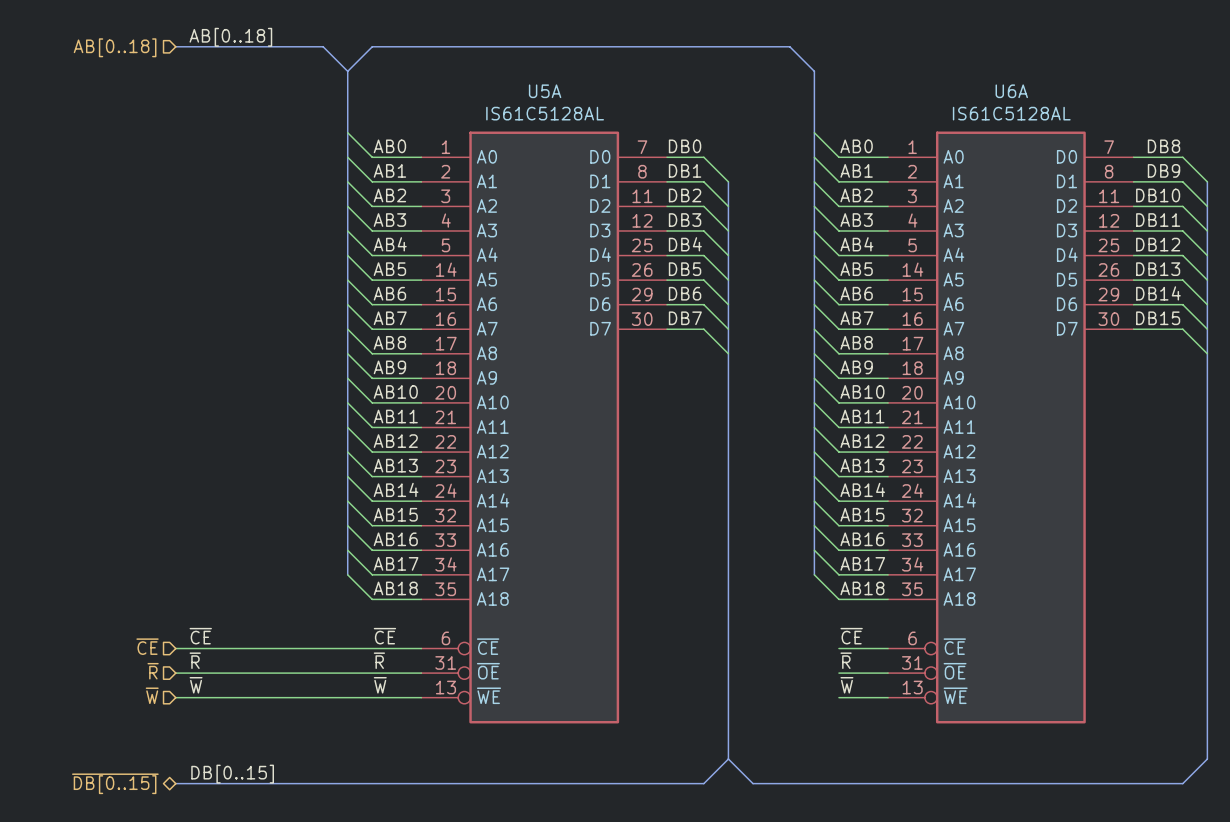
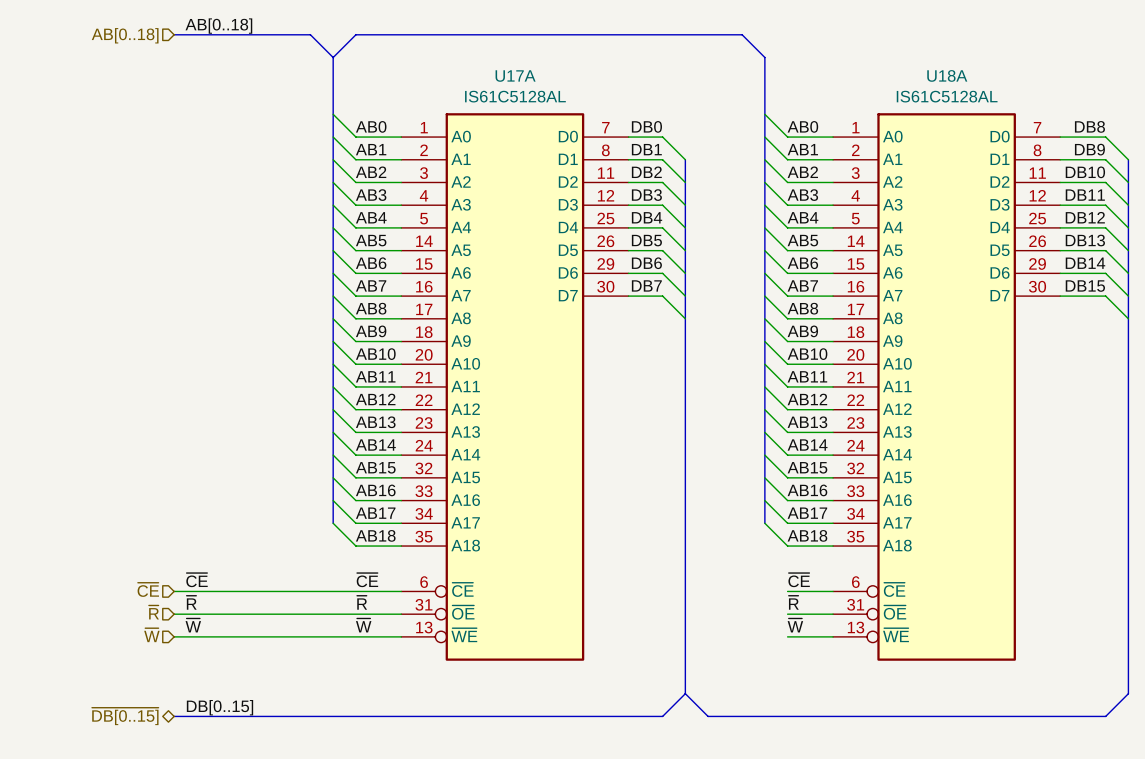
U5A name: U5A (545, 91) -> U17A (515, 76)
U6A name: U6A (1011, 91) -> U18A (947, 75)

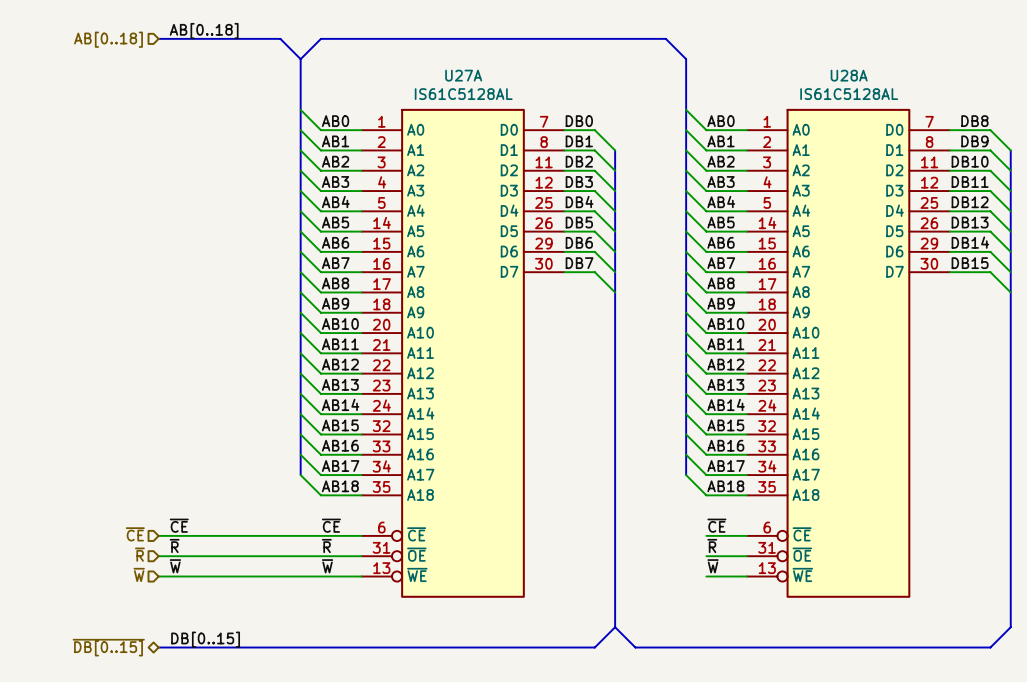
U18A name: U18A (947, 75) -> U28A (849, 75)
U17A name: U17A (515, 76) -> U27A (463, 75)

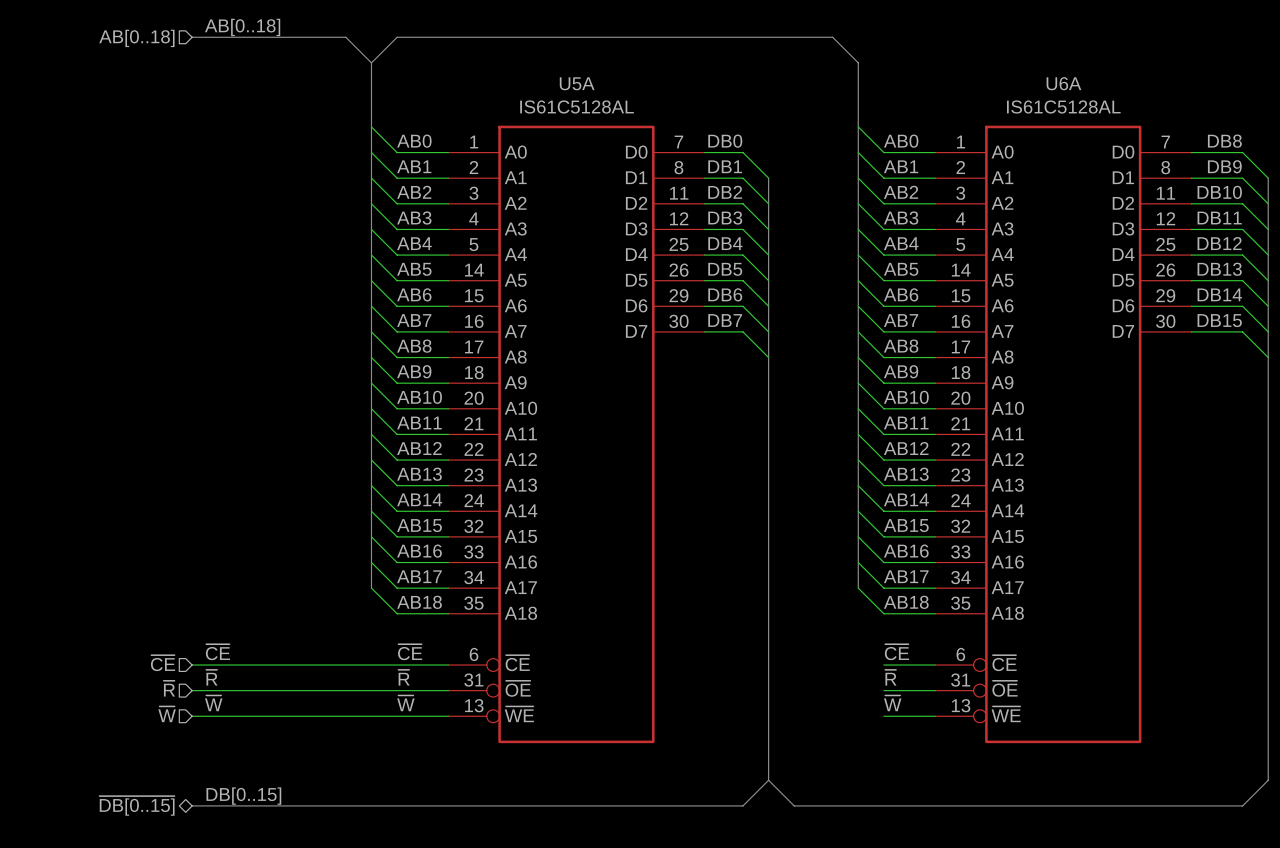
U27A name: U27A (463, 75) -> U5A (577, 83)
U28A name: U28A (849, 75) -> U6A (1063, 83)

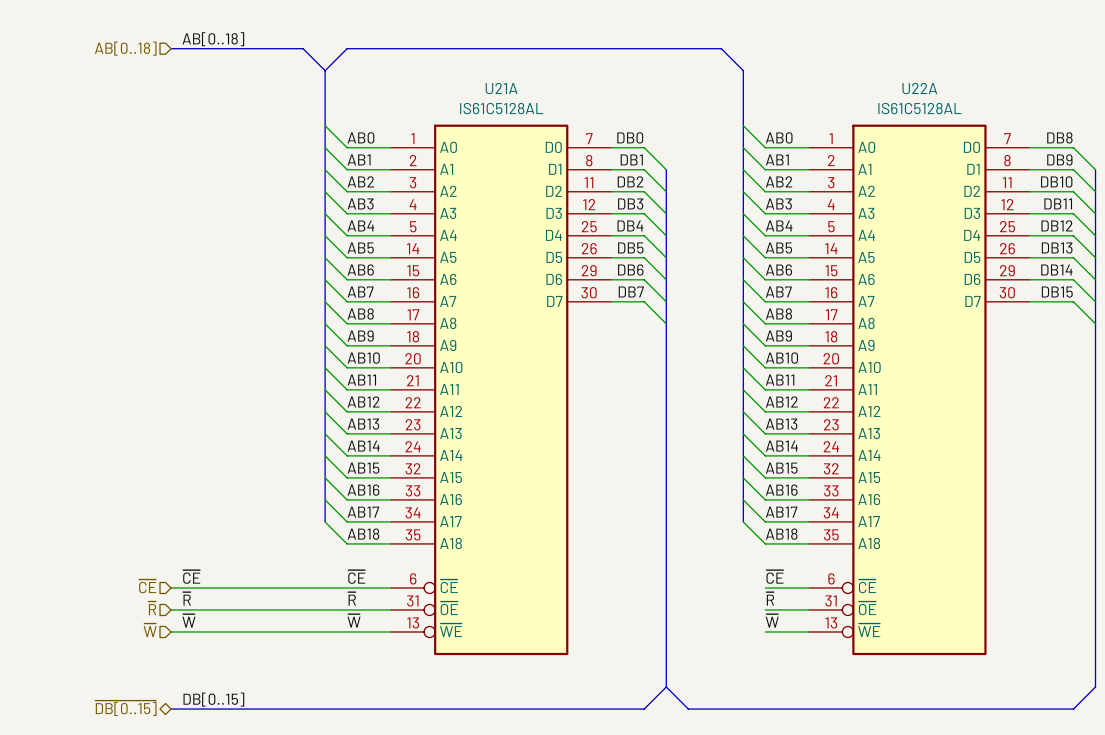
U5A name: U5A (577, 83) -> U21A (501, 88)
U6A name: U6A (1063, 83) -> U22A (919, 88)

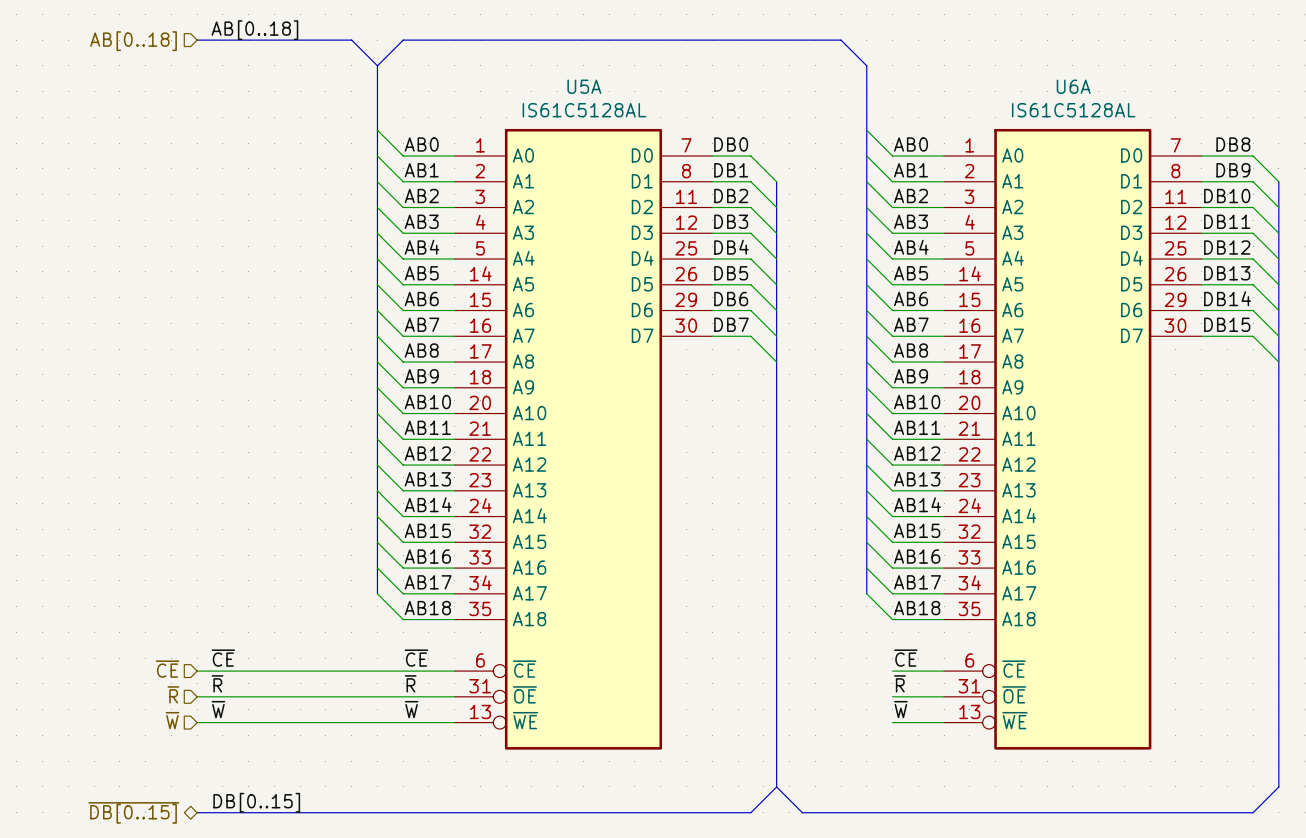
U21A name: U21A (501, 88) -> U5A (584, 86)
U22A name: U22A (919, 88) -> U6A (1073, 86)

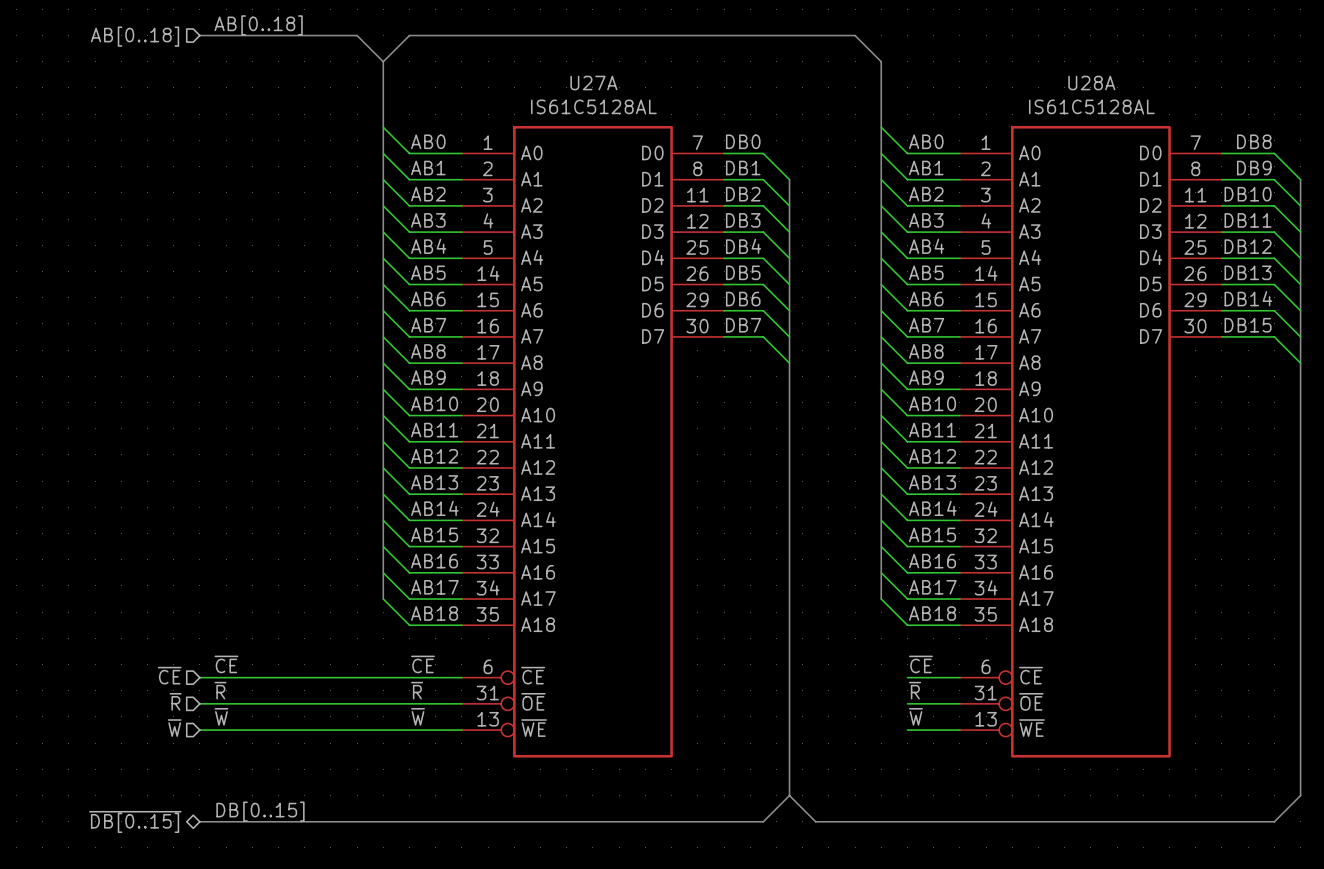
U5A name: U5A (584, 86) -> U27A (593, 83)
U6A name: U6A (1073, 86) -> U28A (1091, 83)

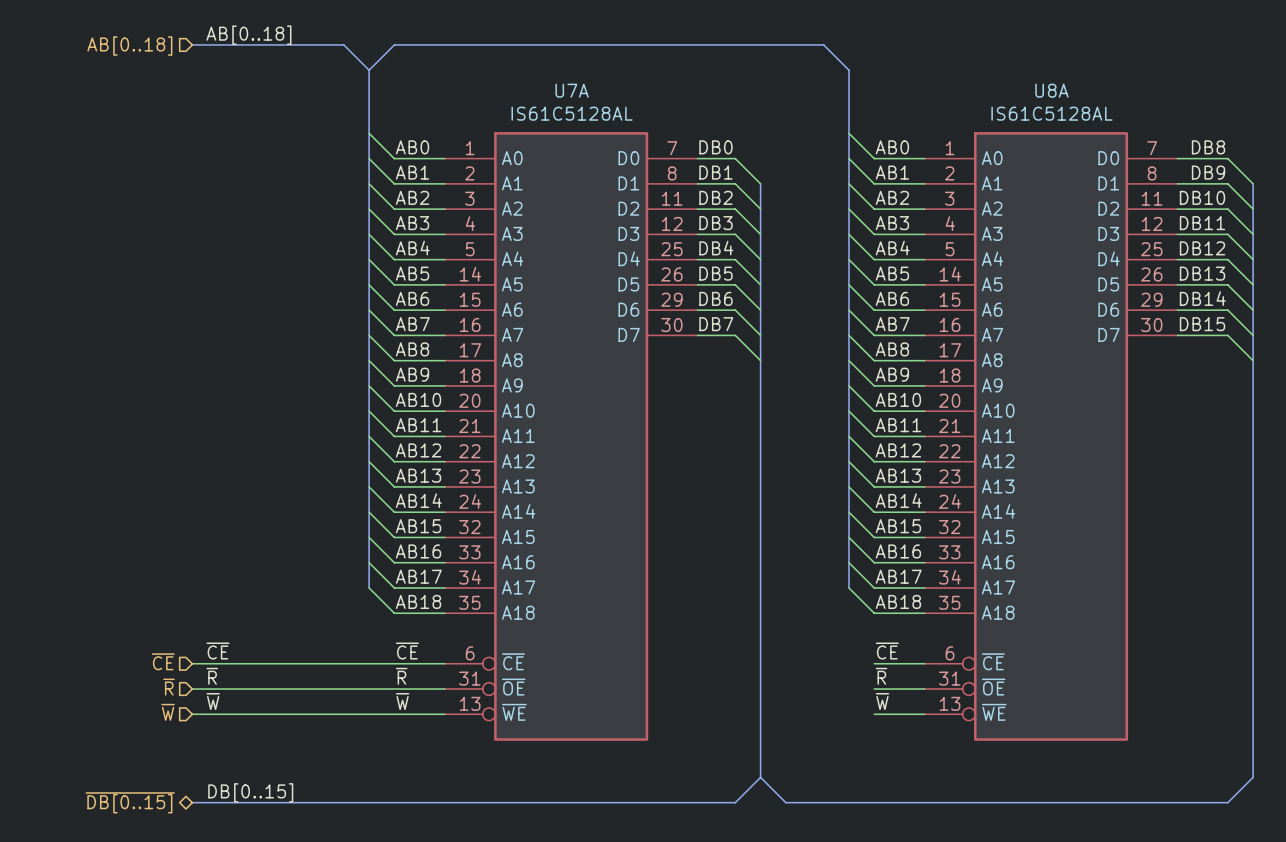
U27A name: U27A (593, 83) -> U7A (572, 90)
U28A name: U28A (1091, 83) -> U8A (1051, 90)

